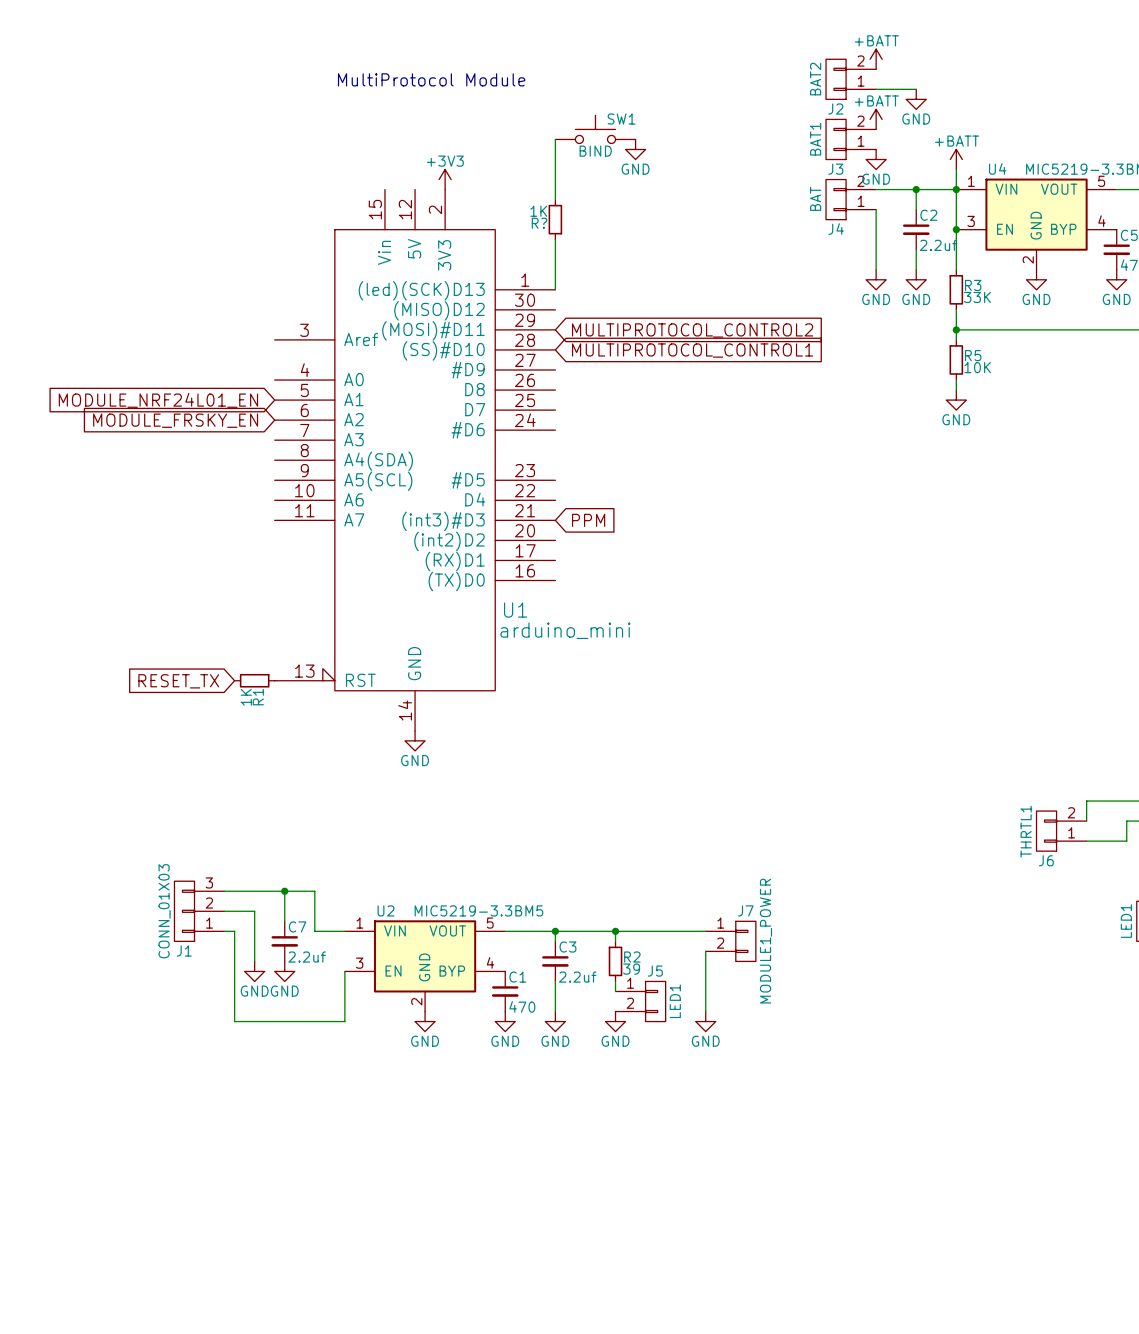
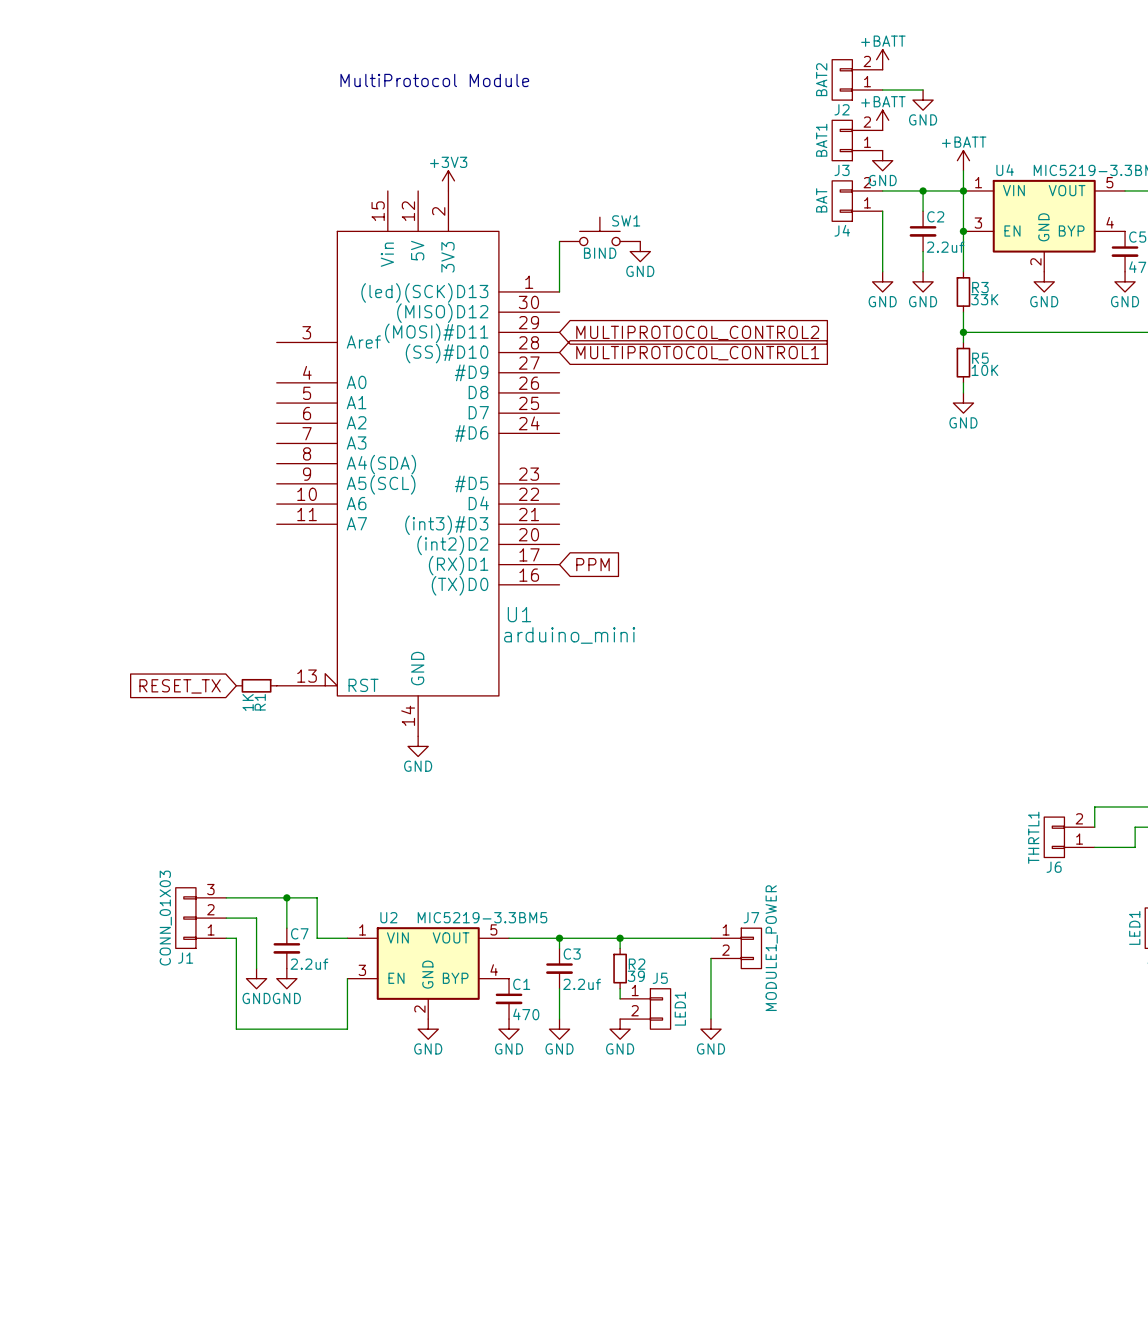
SW1 position: (595, 129) -> (599, 231)
wire: (555, 139) (555, 199) -> none
power symbol position: GND (635, 149) -> GND (640, 251)
R?: 1K (555, 219) -> none
global label: MODULE_NRF24L01_EN (158, 400) -> none
global label: MODULE_FRSKY_EN (175, 420) -> none
global label position: PPM (588, 520) -> PPM (592, 564)

